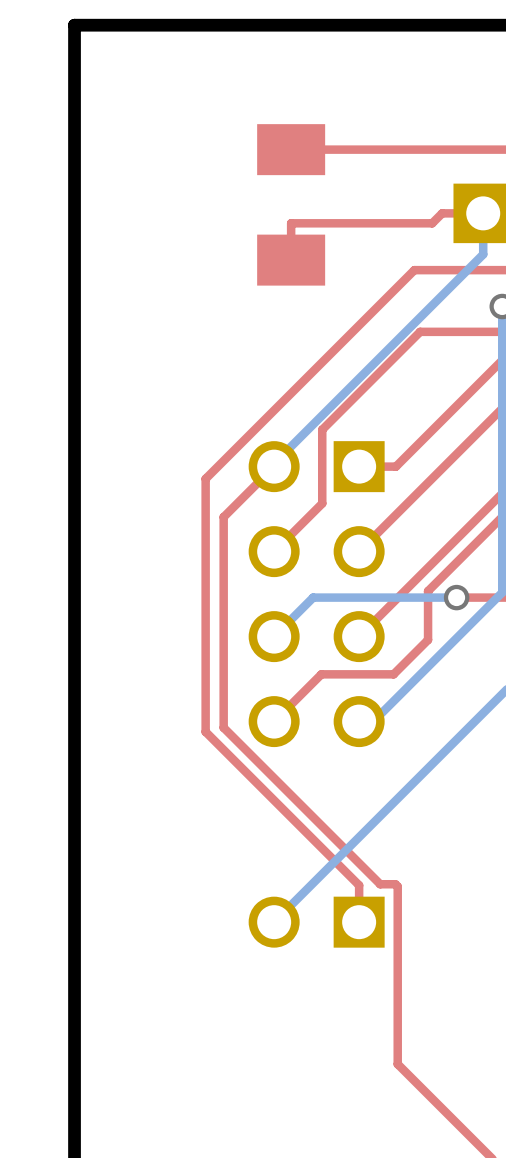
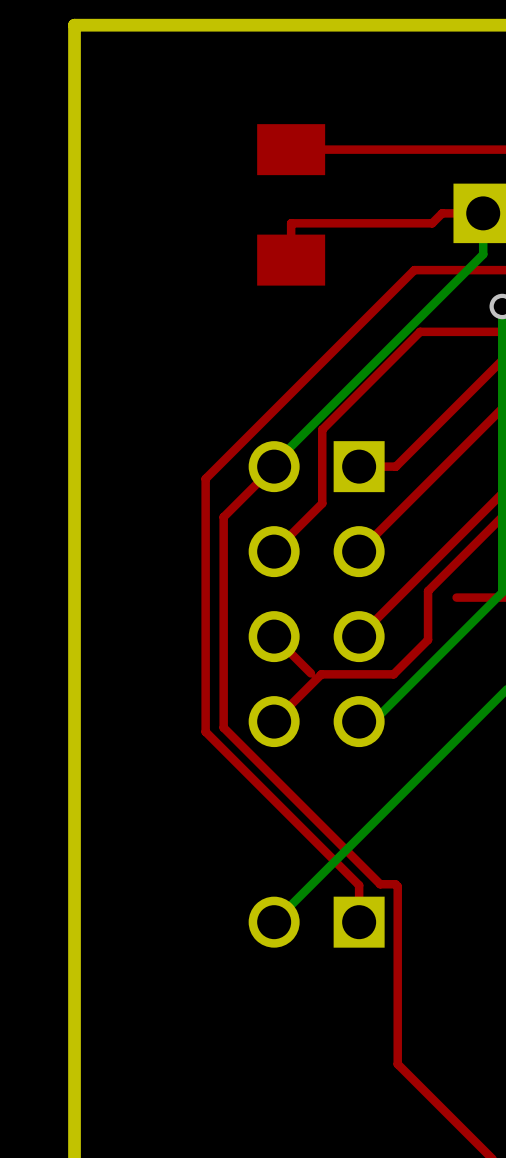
bottom track: (456, 597) (313, 597) (274, 636) -> none
via: (456, 597) -> none
top track: none -> (274, 636) (310, 673)

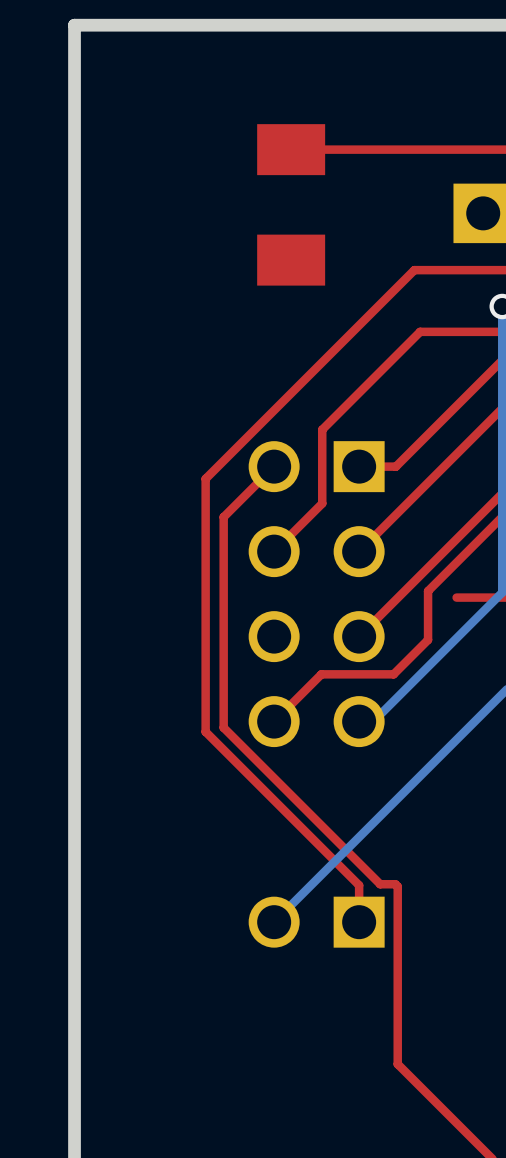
top track: (483, 213) (442, 213) (432, 223) (291, 223) (291, 260) -> none
bottom track: (483, 213) (483, 254) (274, 463) (274, 466) -> none
top track: (274, 636) (310, 673) -> none

